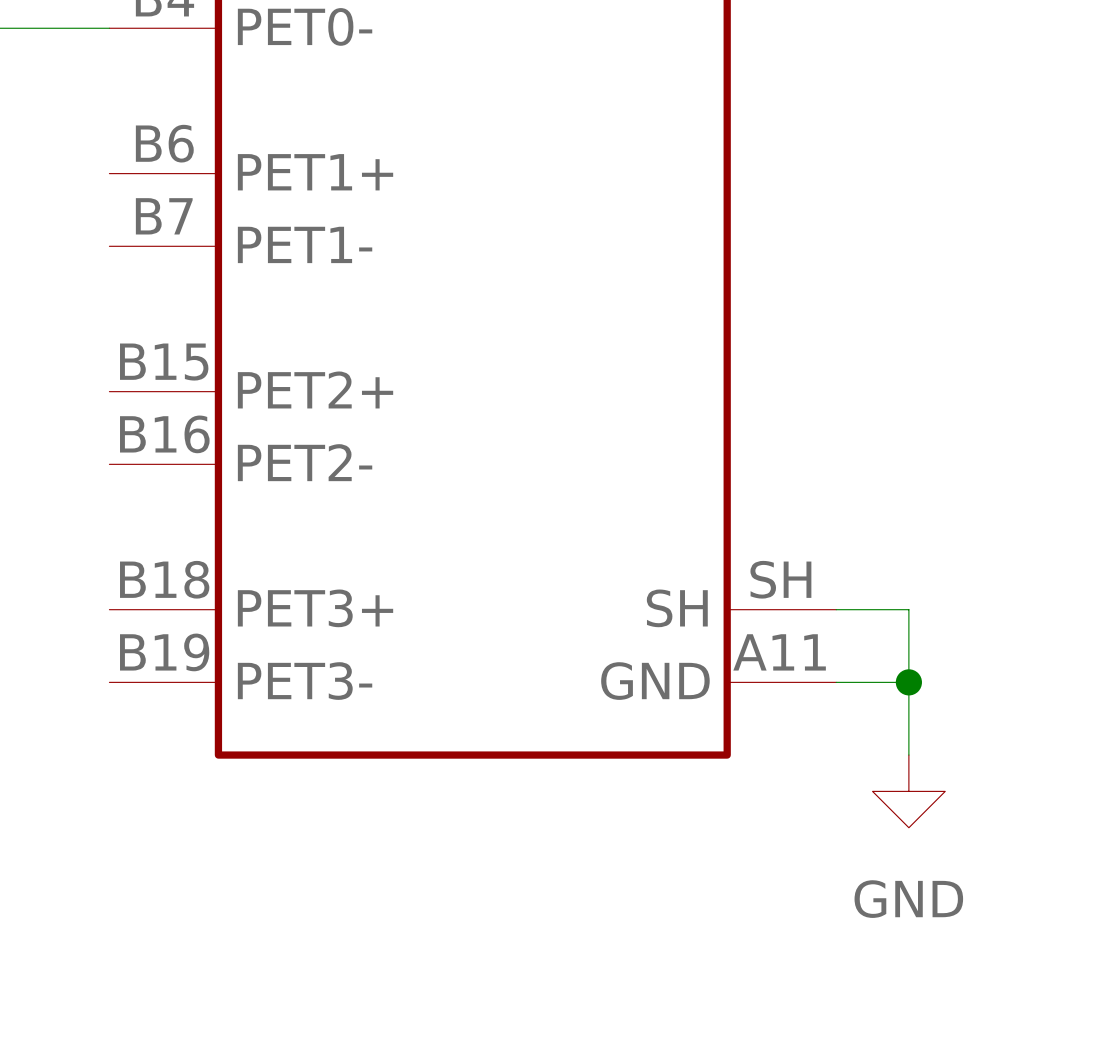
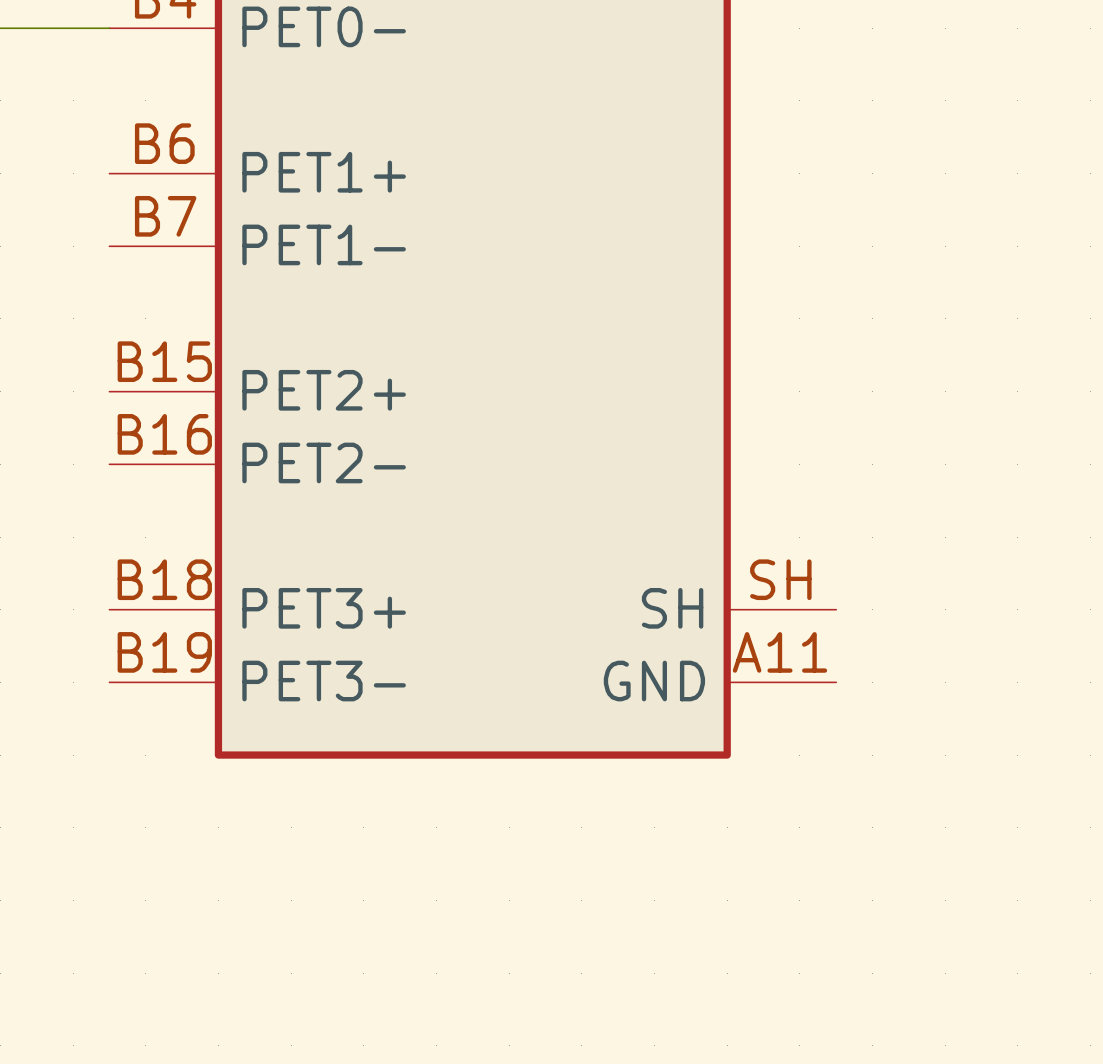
wire: (836, 609) (908, 609) (908, 755) -> none
wire: (836, 682) (908, 682) -> none
junction: (908, 682) -> none
power symbol: GND (908, 791) -> none

